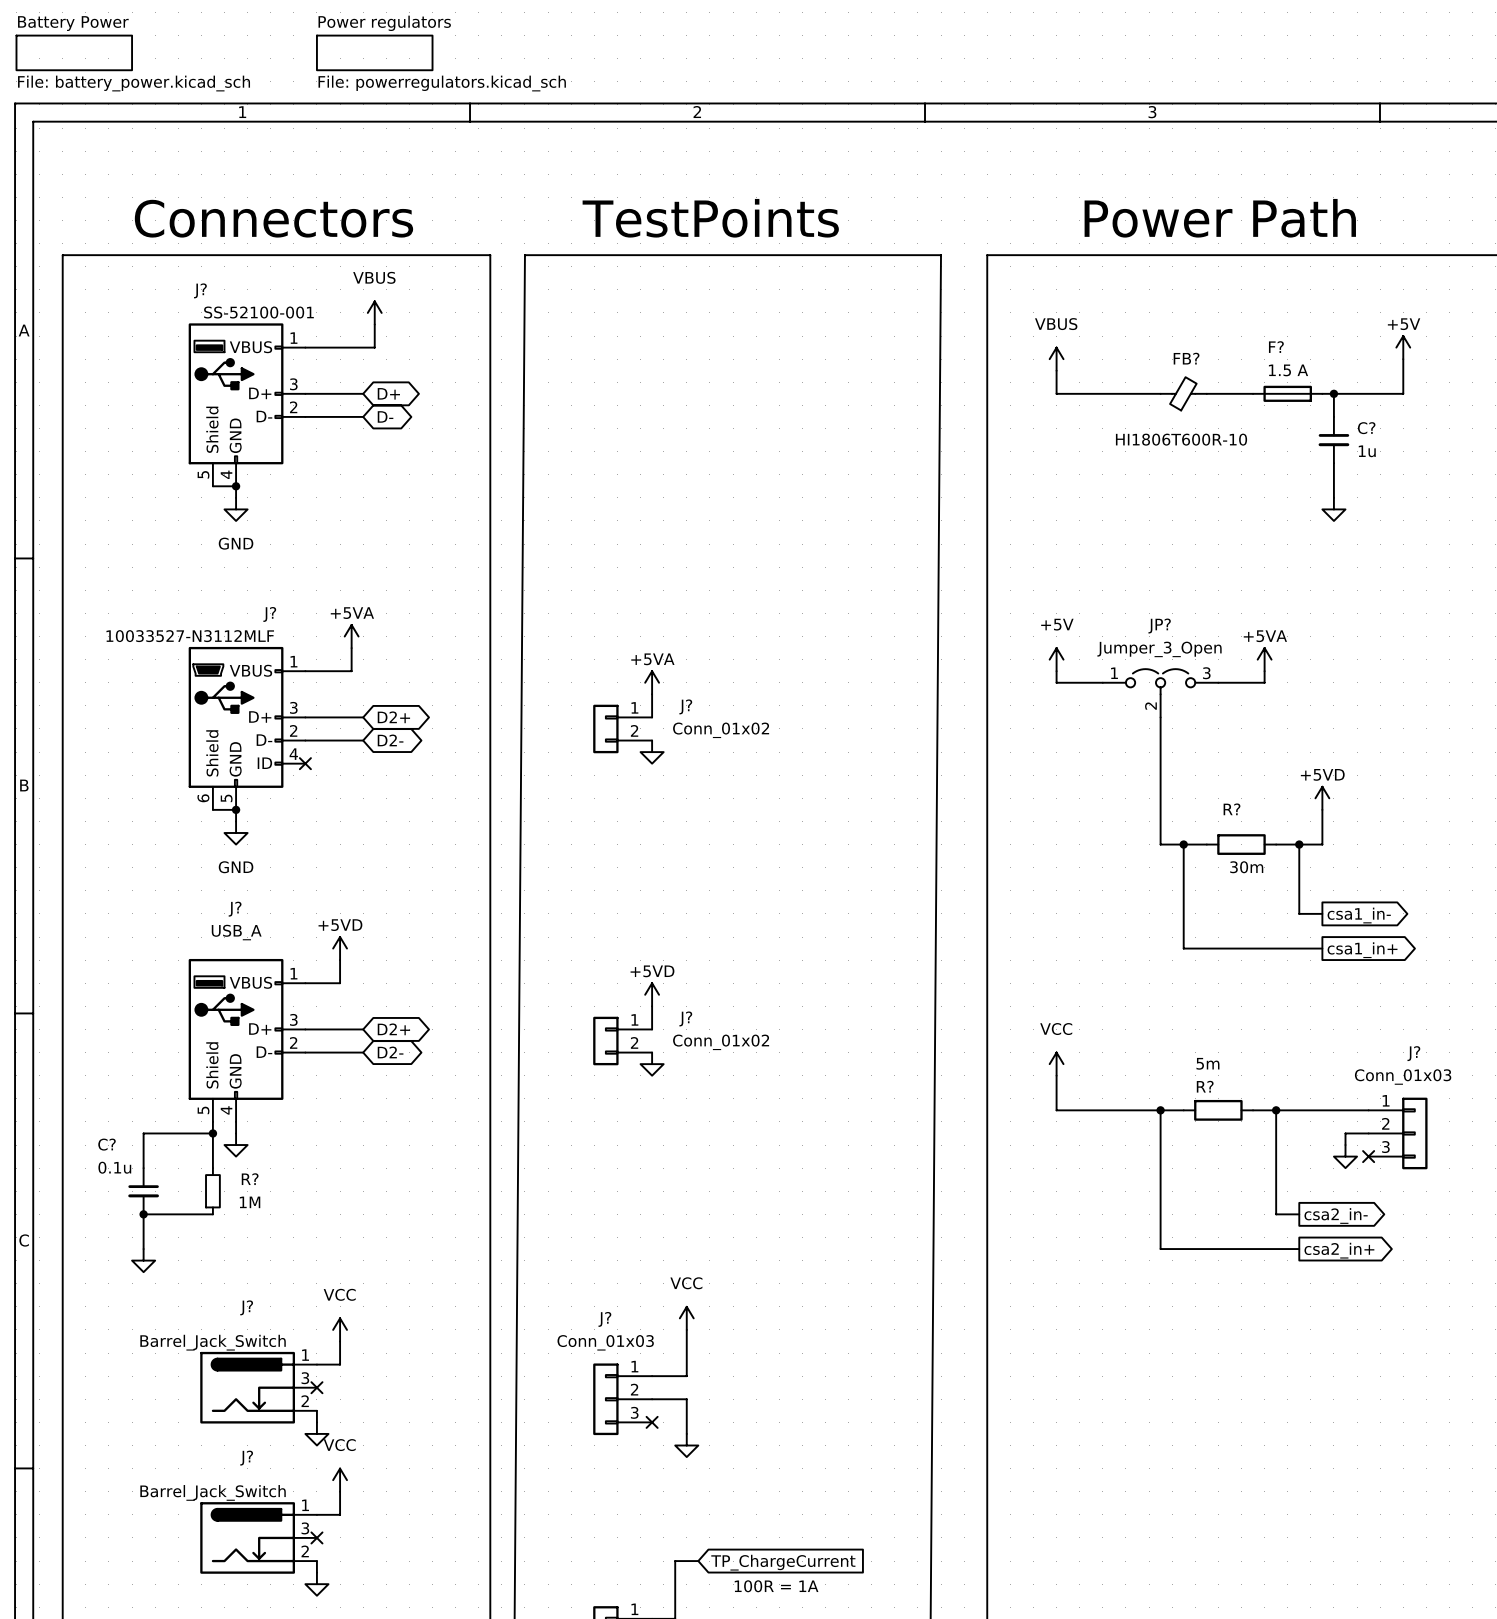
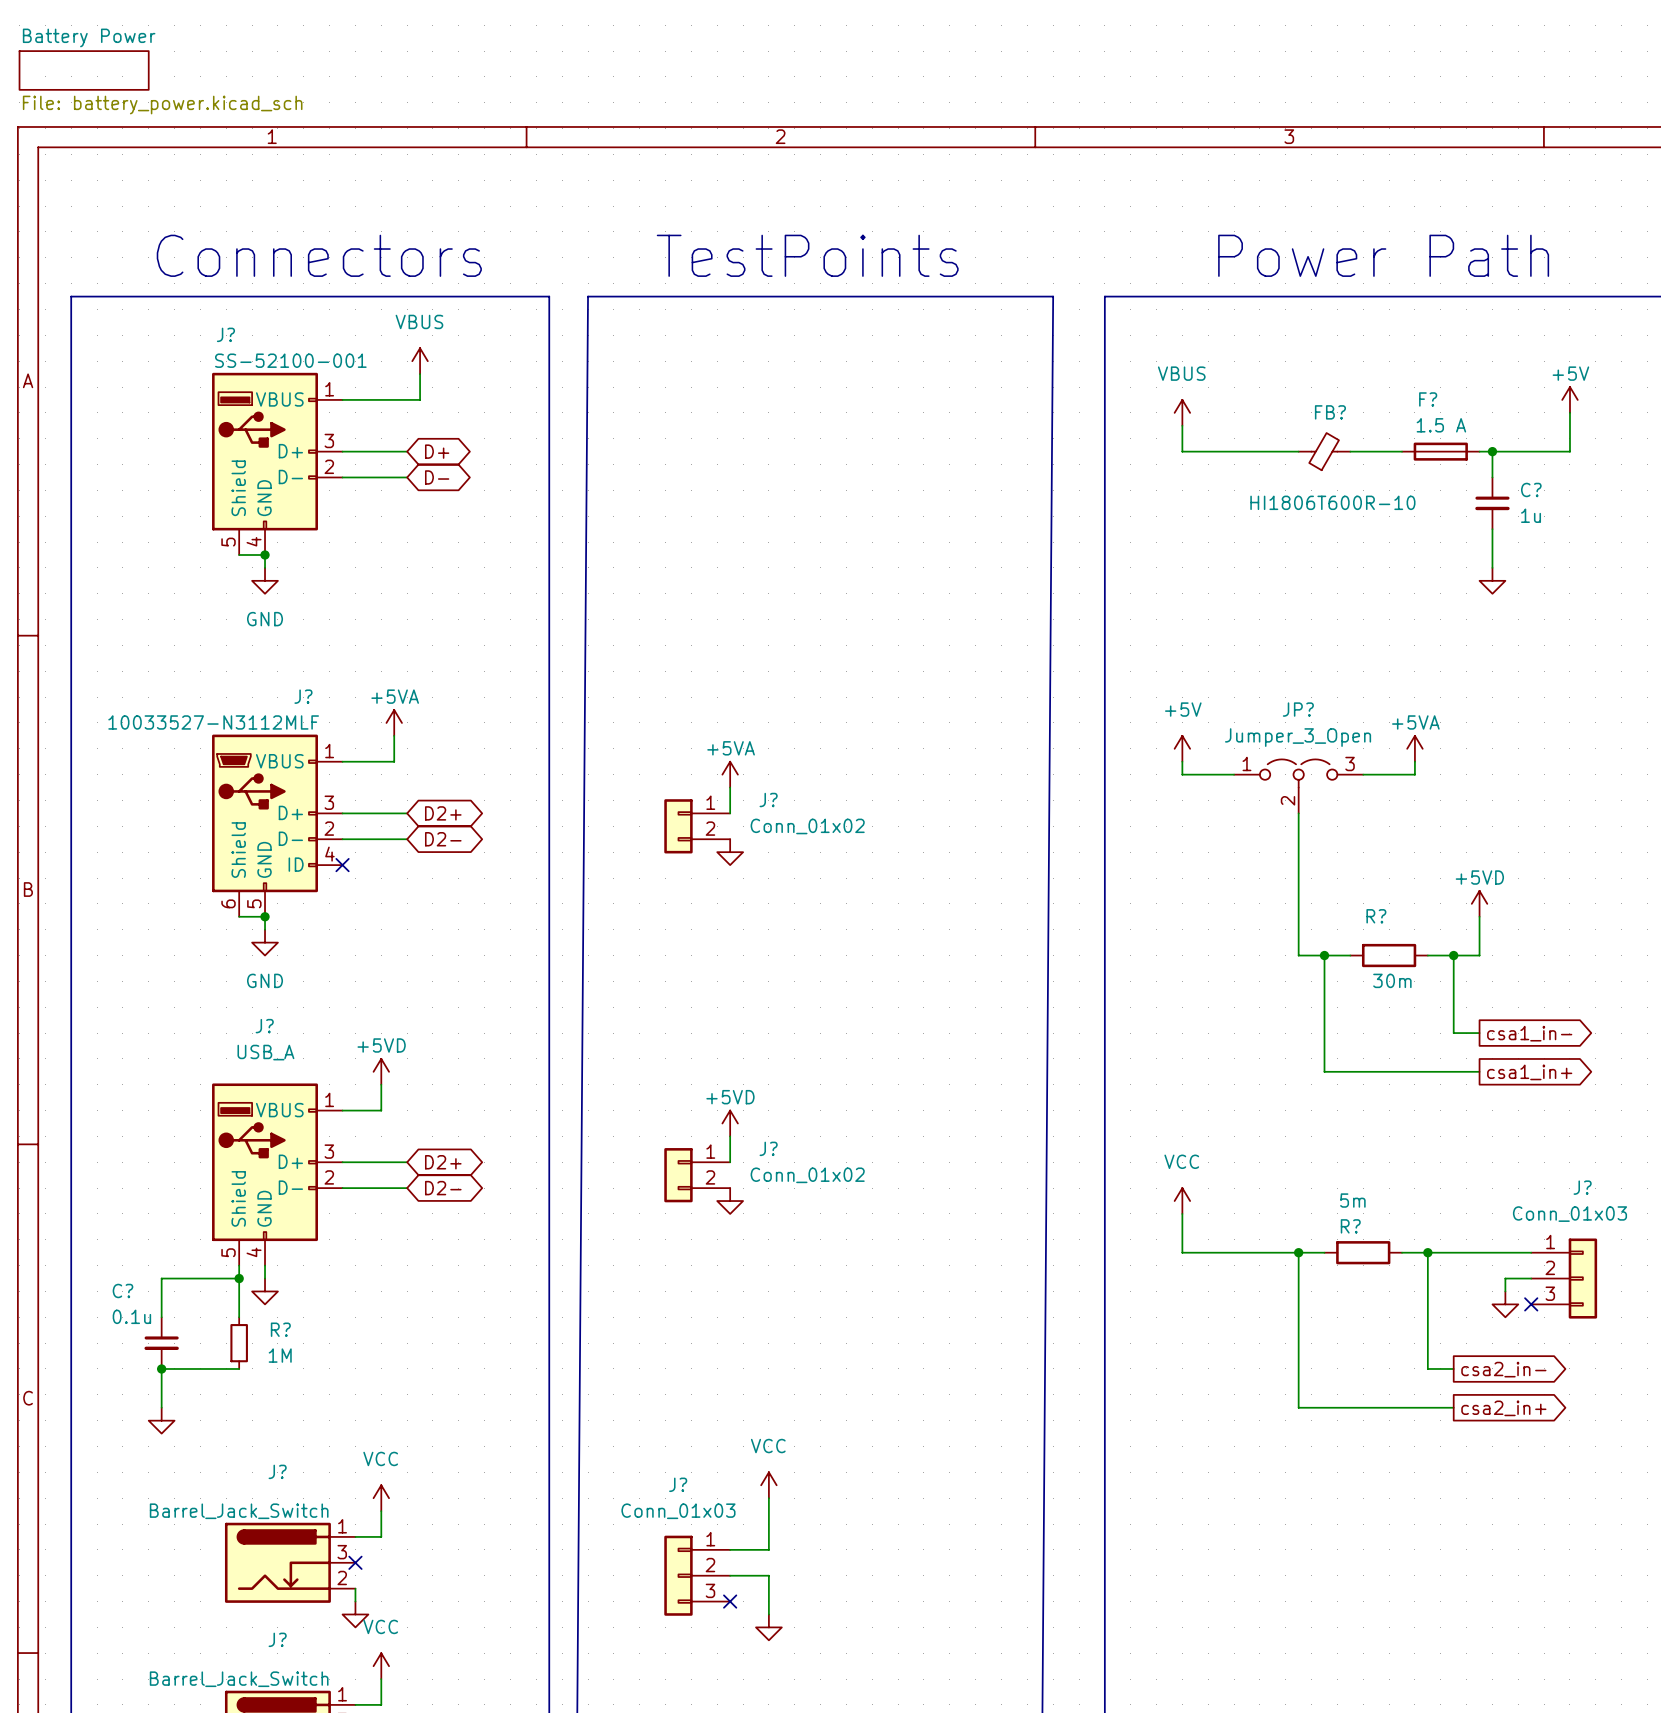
sheet Power regulators: File: powerregulators.kicad_sch (374, 52) -> none

